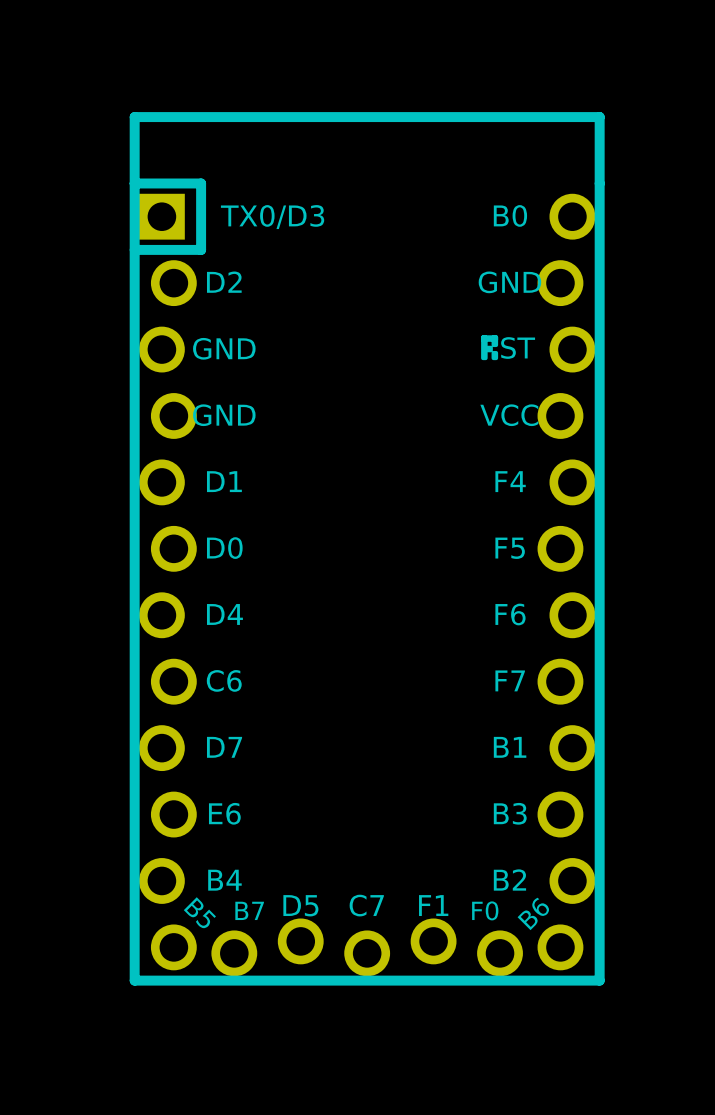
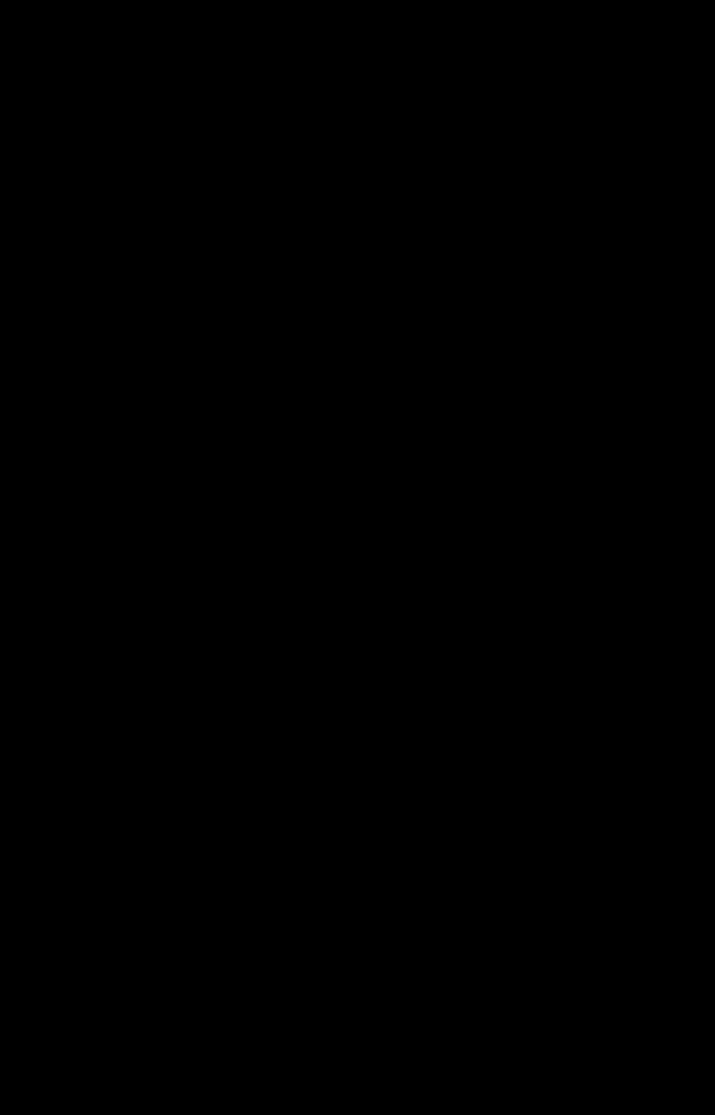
part: (367, 548) -> none

